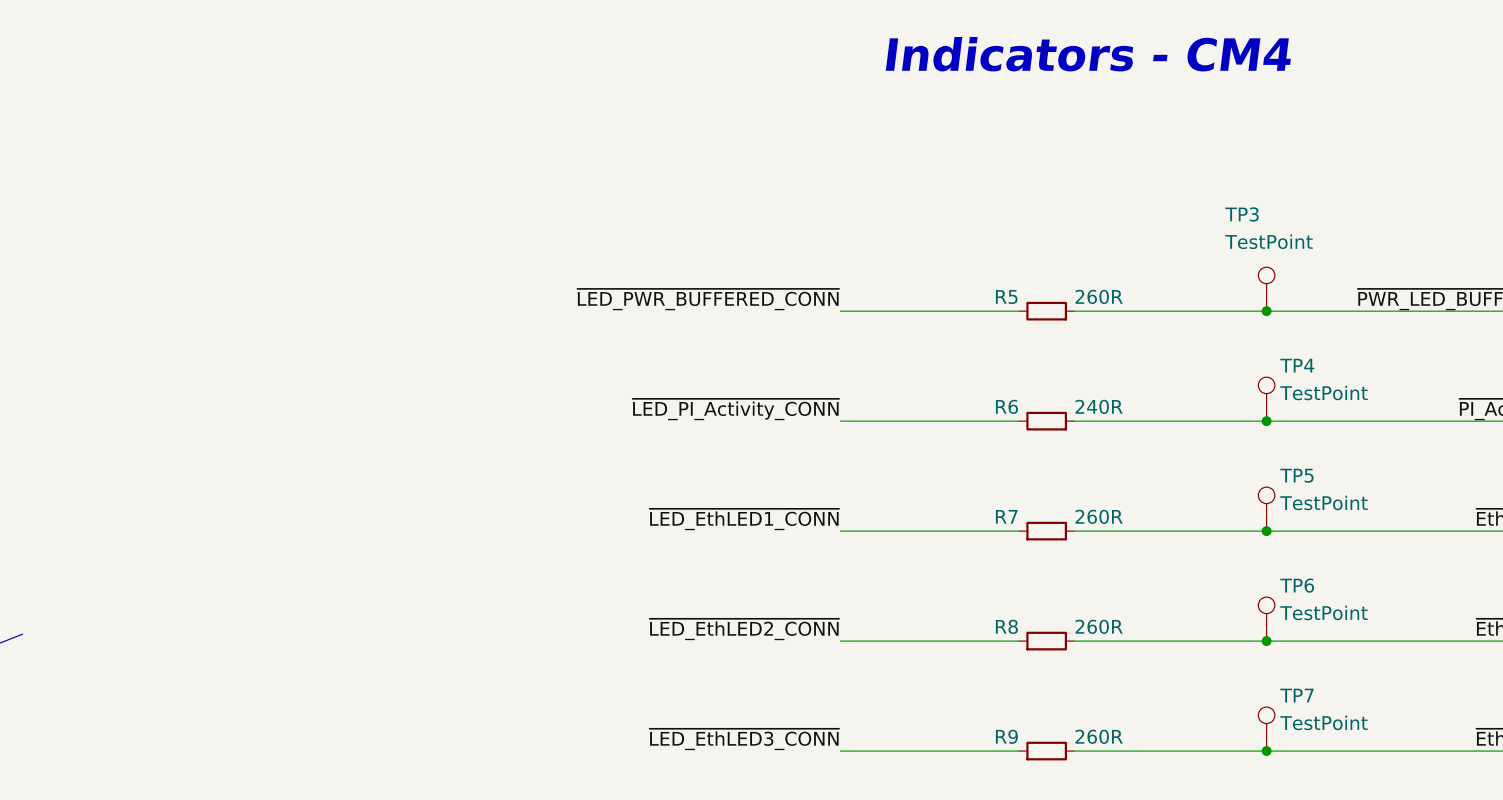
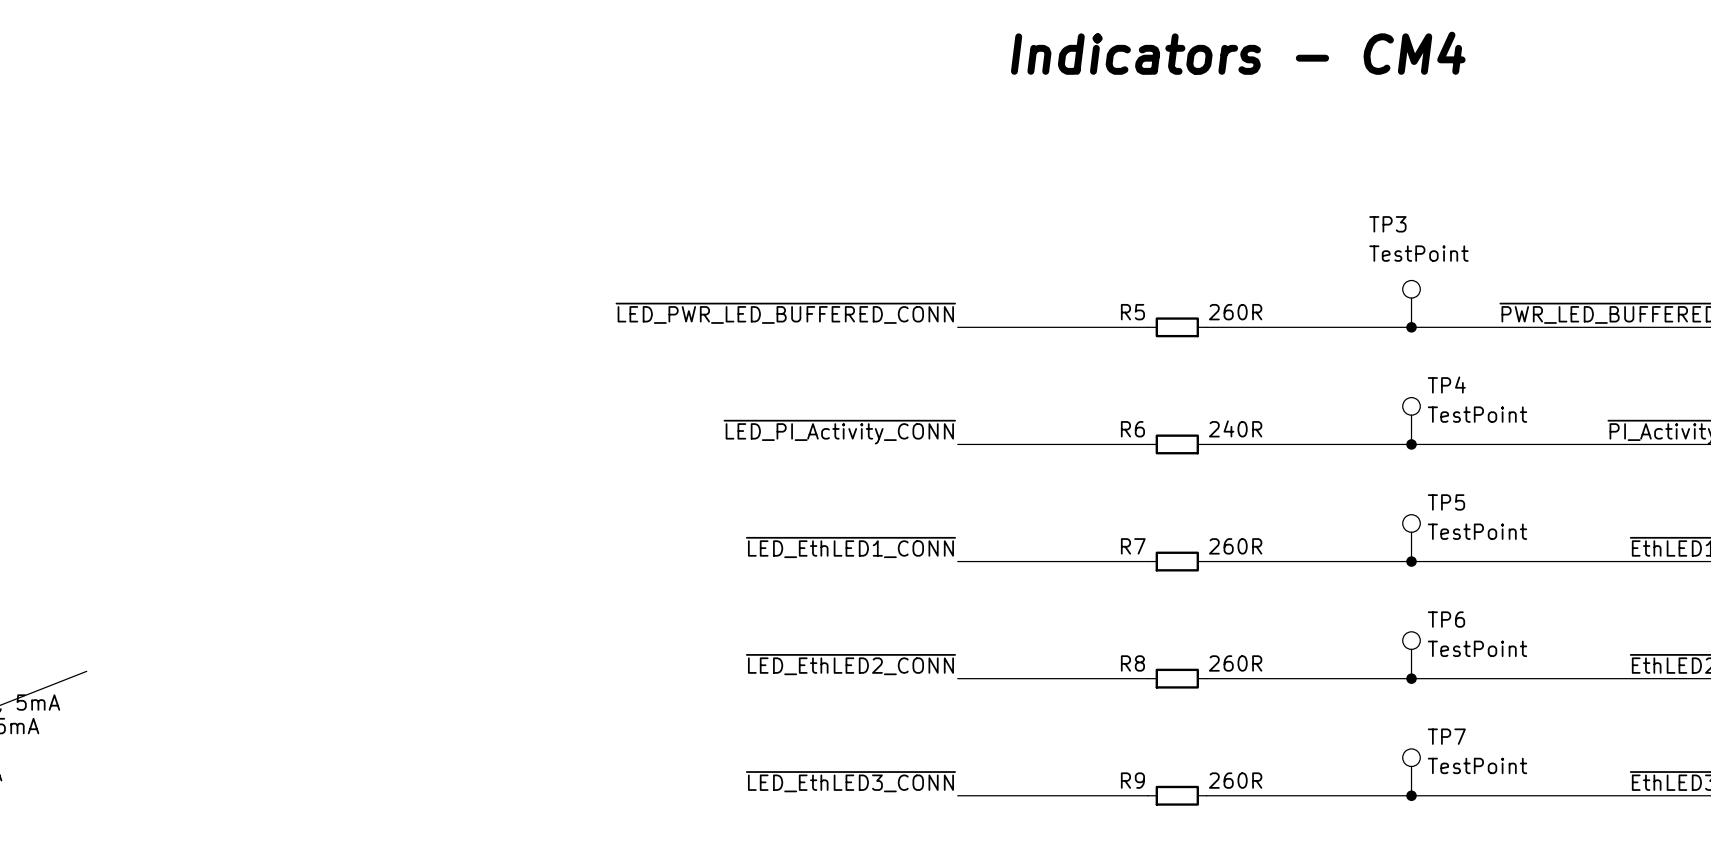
label: ~{LED_PWR_BUFFERED_CONN} (708, 299) -> ~{LED_PWR_LED_BUFFERED_CONN} (785, 313)

